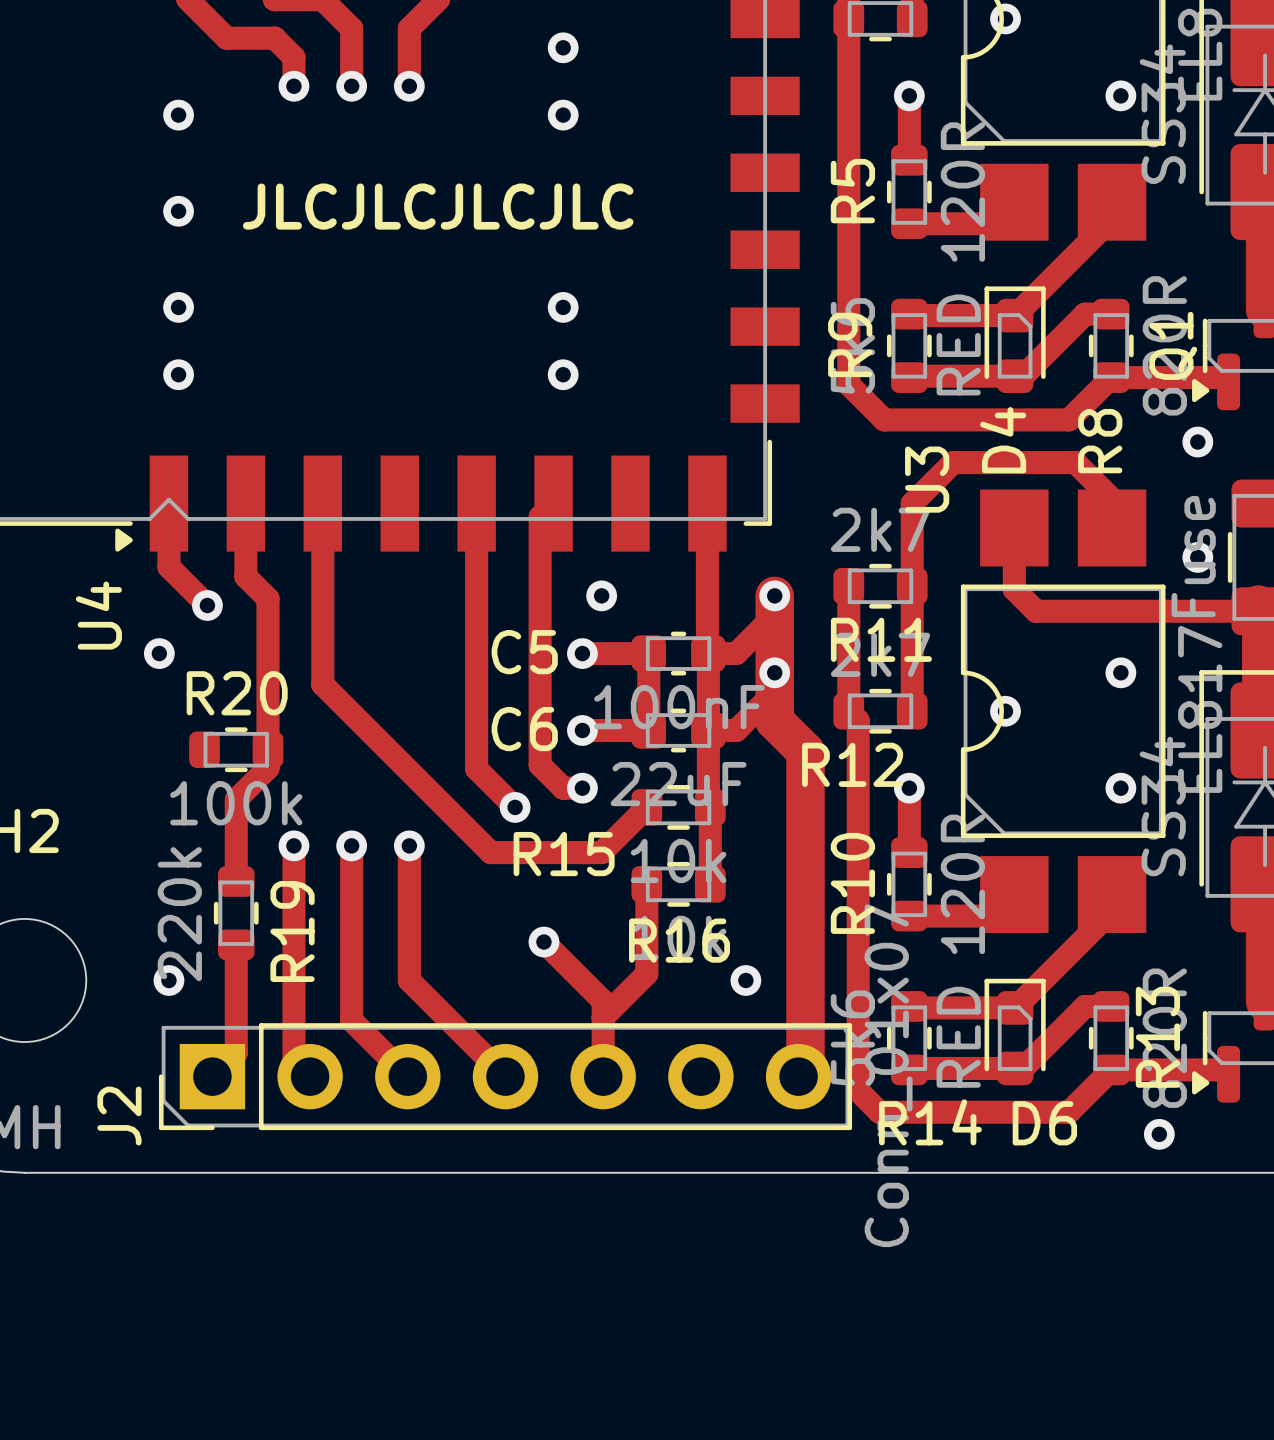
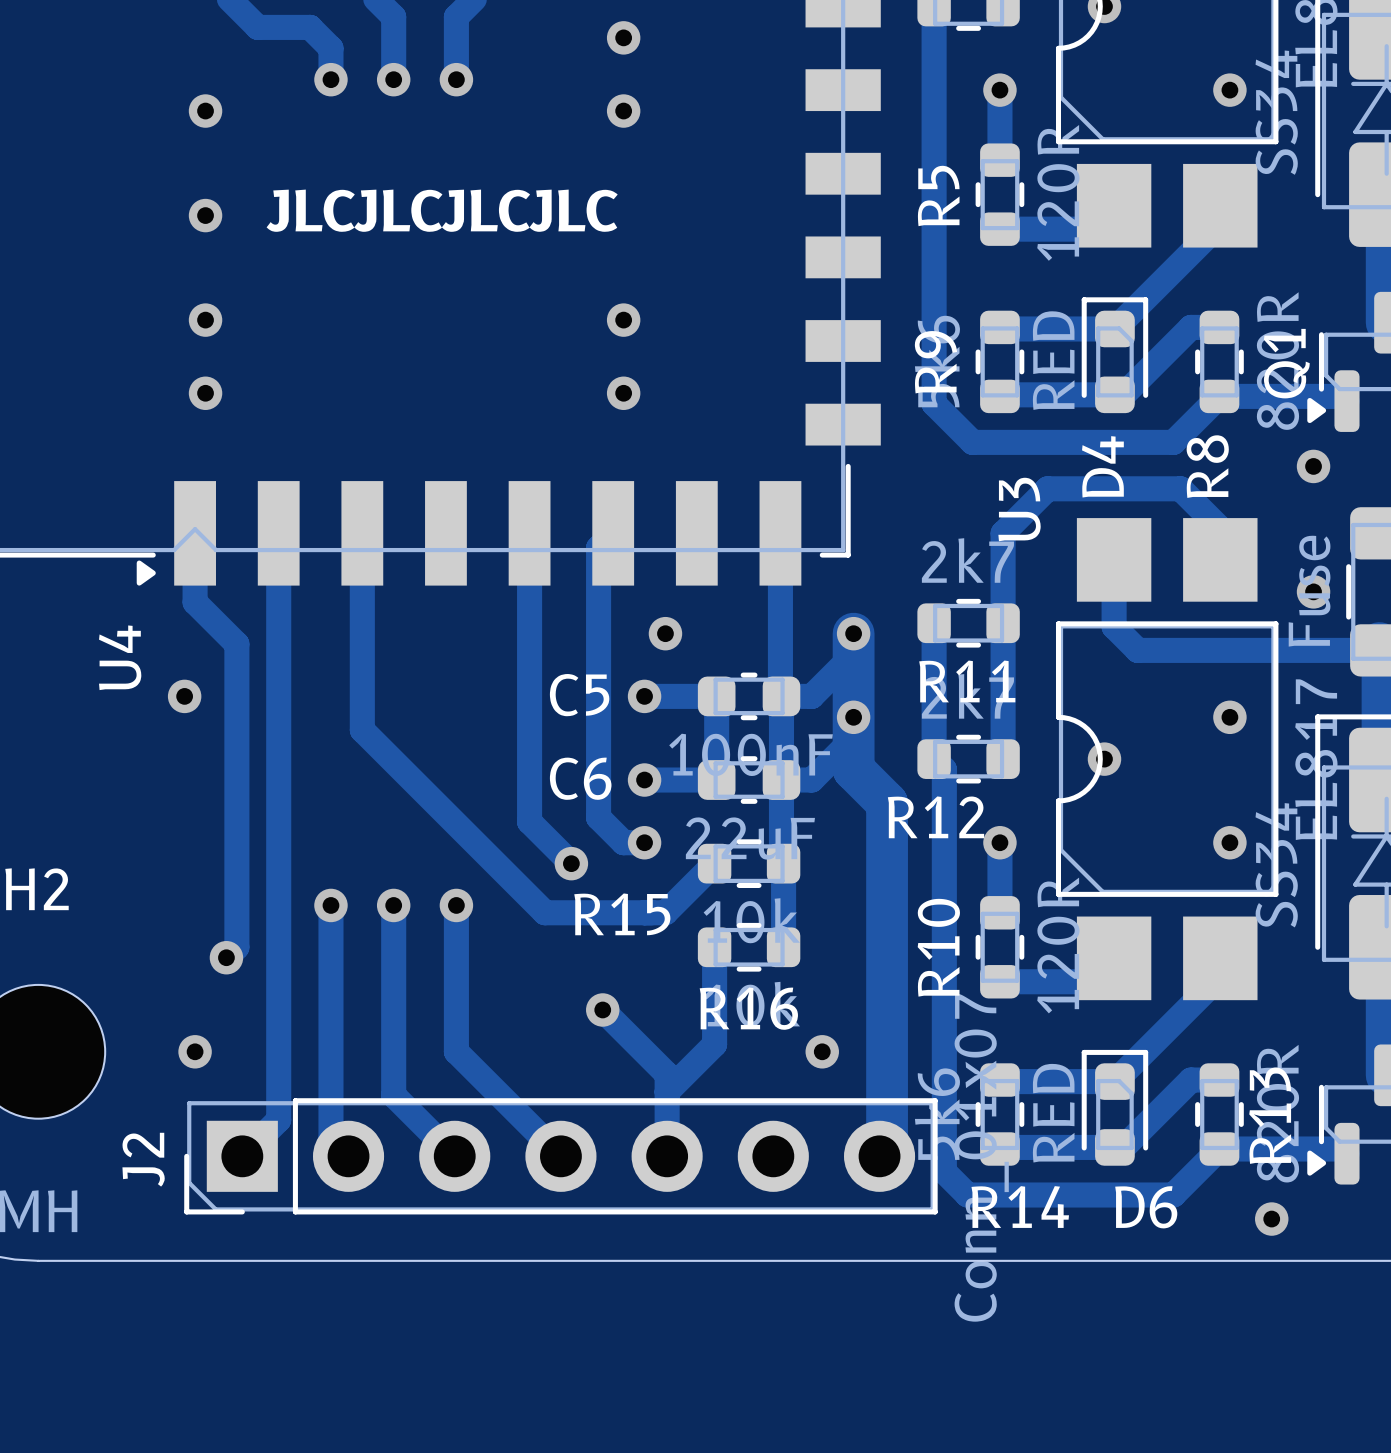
track: (245, 576) (268, 598) (268, 767) (236, 799) (236, 881) -> (278, 612) (278, 1119) (268, 1130)
track: none -> (236, 644) (236, 947) (226, 957)
via: (207, 605) -> none
R20: 100k (236, 749) -> none
via: none -> (226, 957)
R19: 220k (236, 913) -> none
track: (236, 944) (236, 1052) -> none
J2 name position: J2 (119, 1116) -> J2 (143, 1159)

